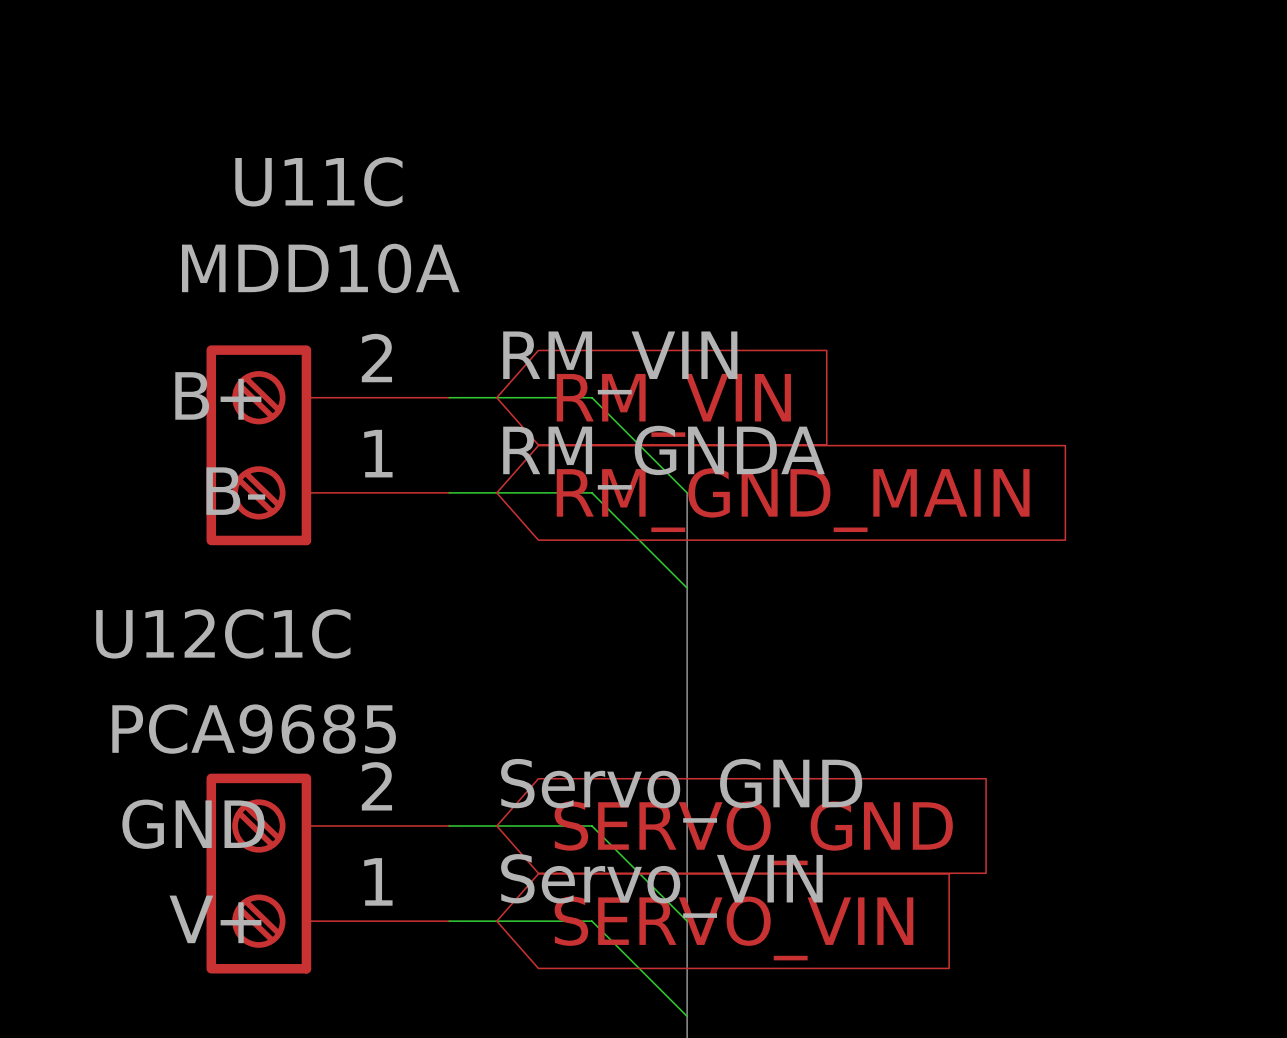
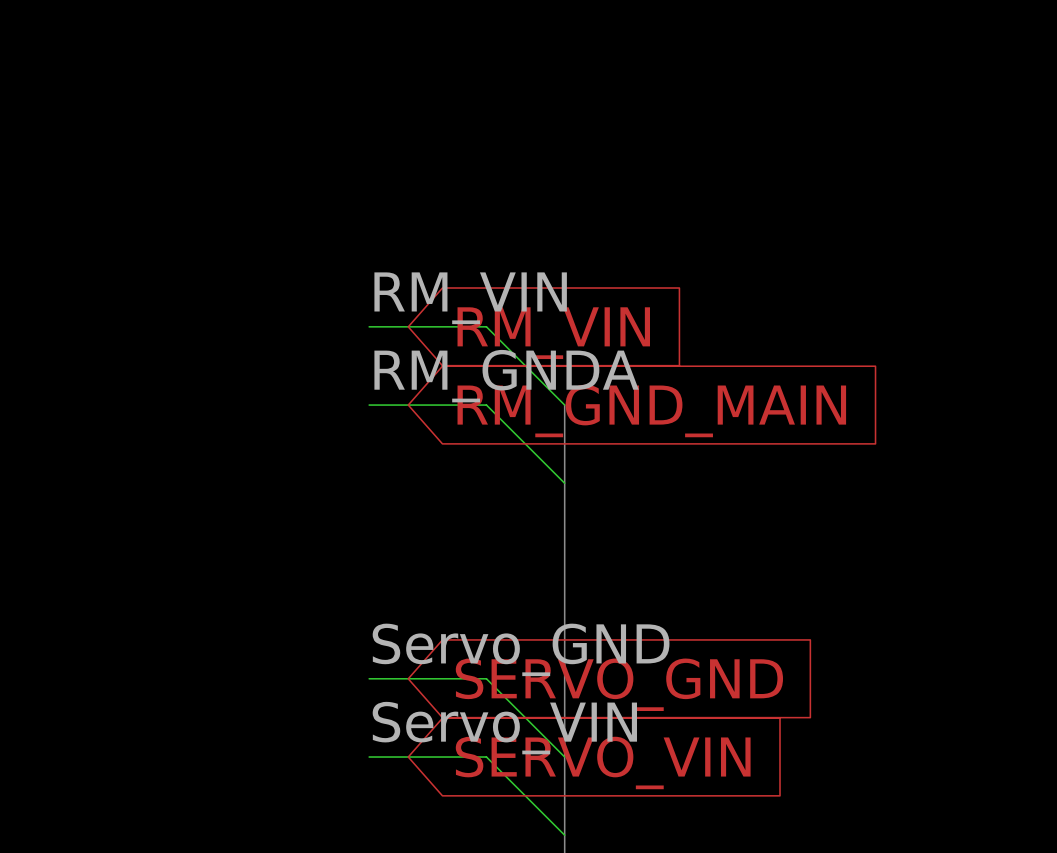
label position: RM_VIN (620, 362) -> RM_VIN (470, 298)
U11C: MDD10A (327, 445) -> none
label position: RM_GNDA (664, 457) -> RM_GNDA (506, 376)
label position: Servo_GND (681, 790) -> Servo_GND (521, 649)
U12C1C: PCA9685 (327, 873) -> none
label position: Servo_VIN (661, 885) -> Servo_VIN (504, 728)

